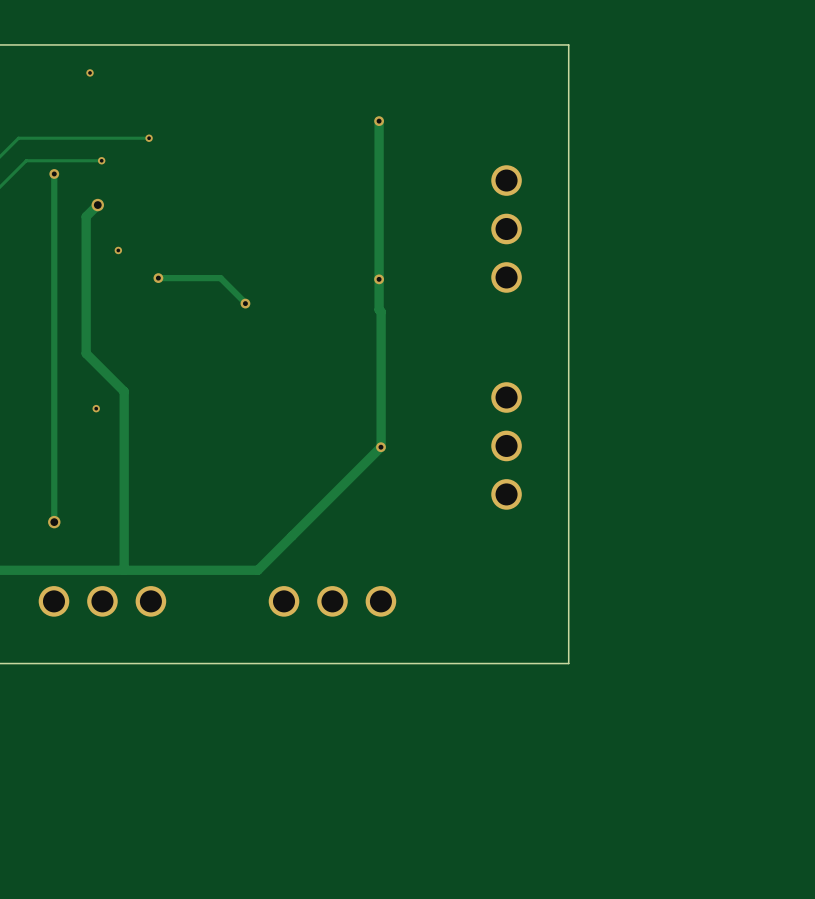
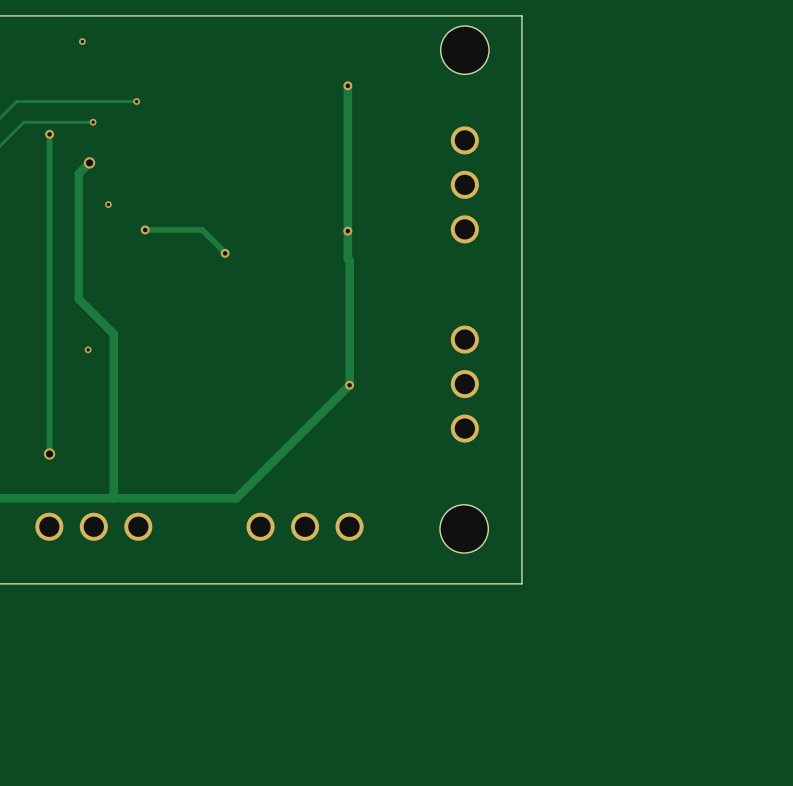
part: none -> (464, 50)
part: none -> (464, 528)

